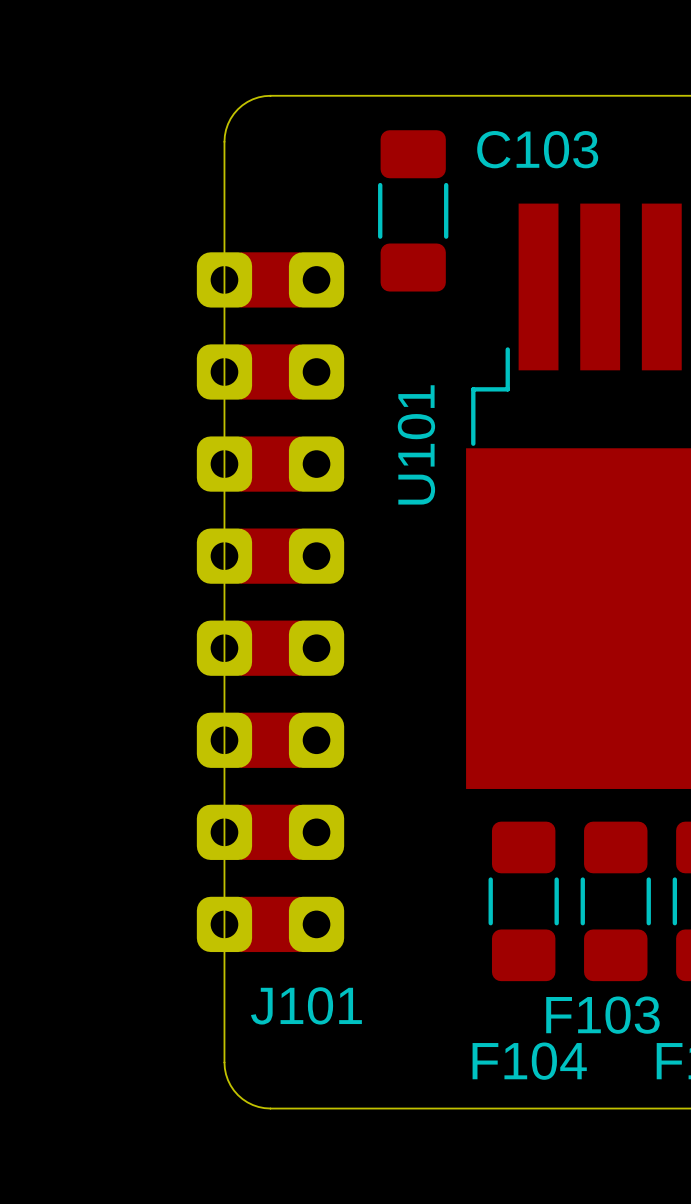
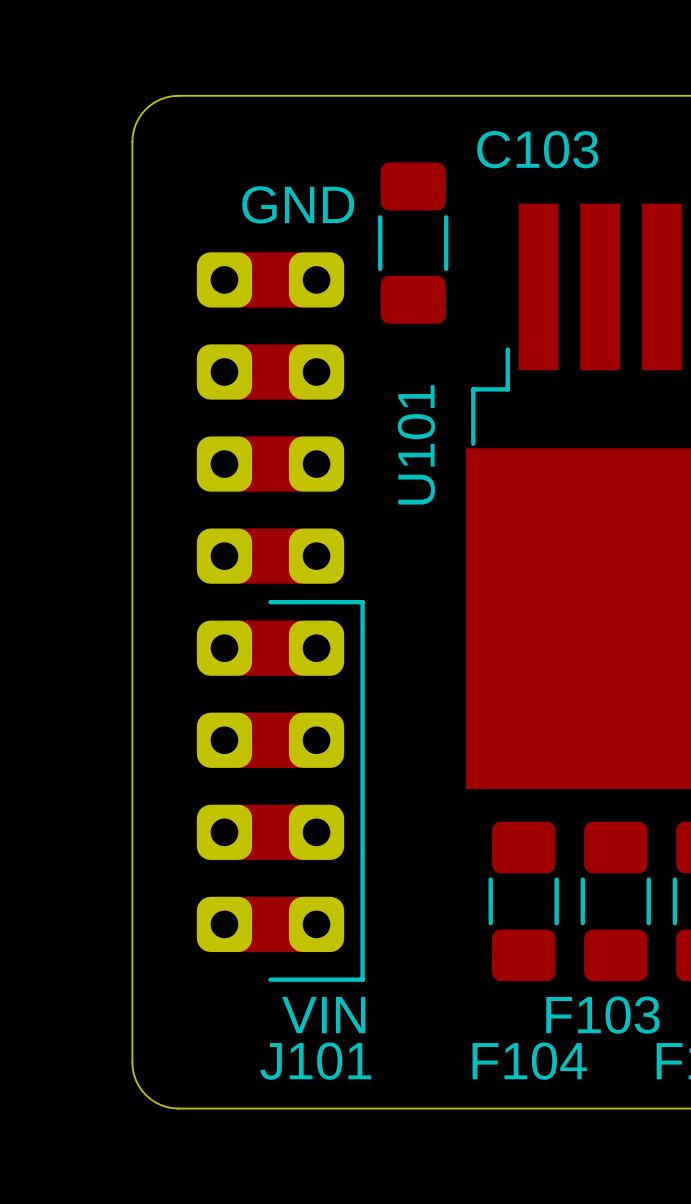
board edge: (270, 95) (252, 99) (237, 109) (227, 124) (224, 141) (224, 1062) (227, 1080) (237, 1095) (252, 1105) (270, 1108) -> (270, 95) (166, 97) (155, 101) (141, 113) (135, 124) (132, 135) (132, 1062) (133, 1074) (141, 1090) (155, 1102) (166, 1106) (270, 1108)
text: none -> GND (298, 204)
C103 position: (413, 210) -> (413, 243)
line: none -> (270, 602) (362, 602) (362, 979) (270, 979)
J101 name position: J101 (306, 1005) -> J101 (315, 1061)
text: none -> VIN (323, 1015)

